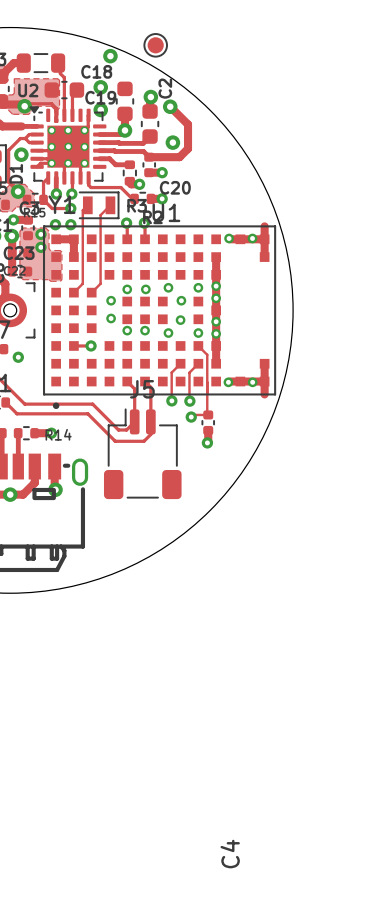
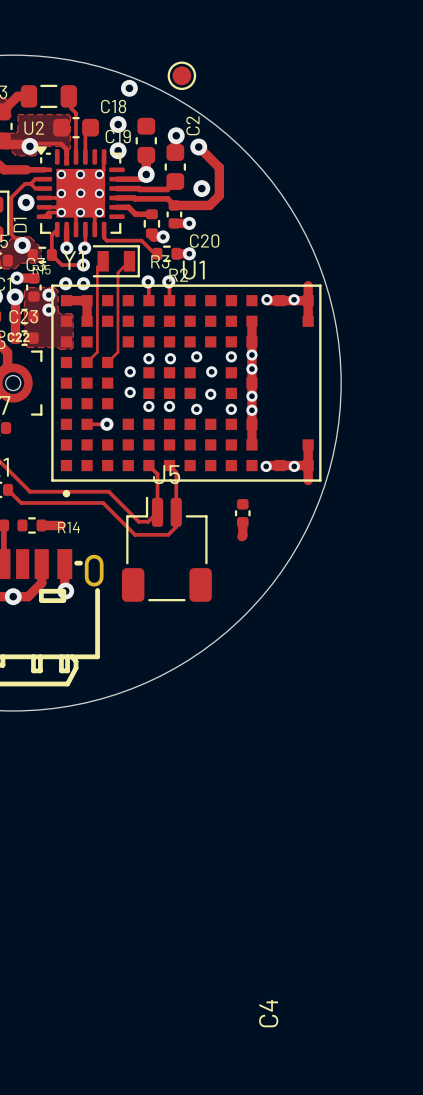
track: (198, 345) (207, 354) (208, 414) (193, 414) (191, 417) -> none
via: (18, 357) -> none
track: (180, 363) (171, 372) (171, 400) -> none
track: (198, 363) (189, 372) (189, 401) -> none
via: (171, 400) -> none
via: (189, 401) -> none
via: (191, 417) -> none
track: (18, 433) (18, 466) -> none
via: (51, 433) -> none
via: (207, 442) -> none

